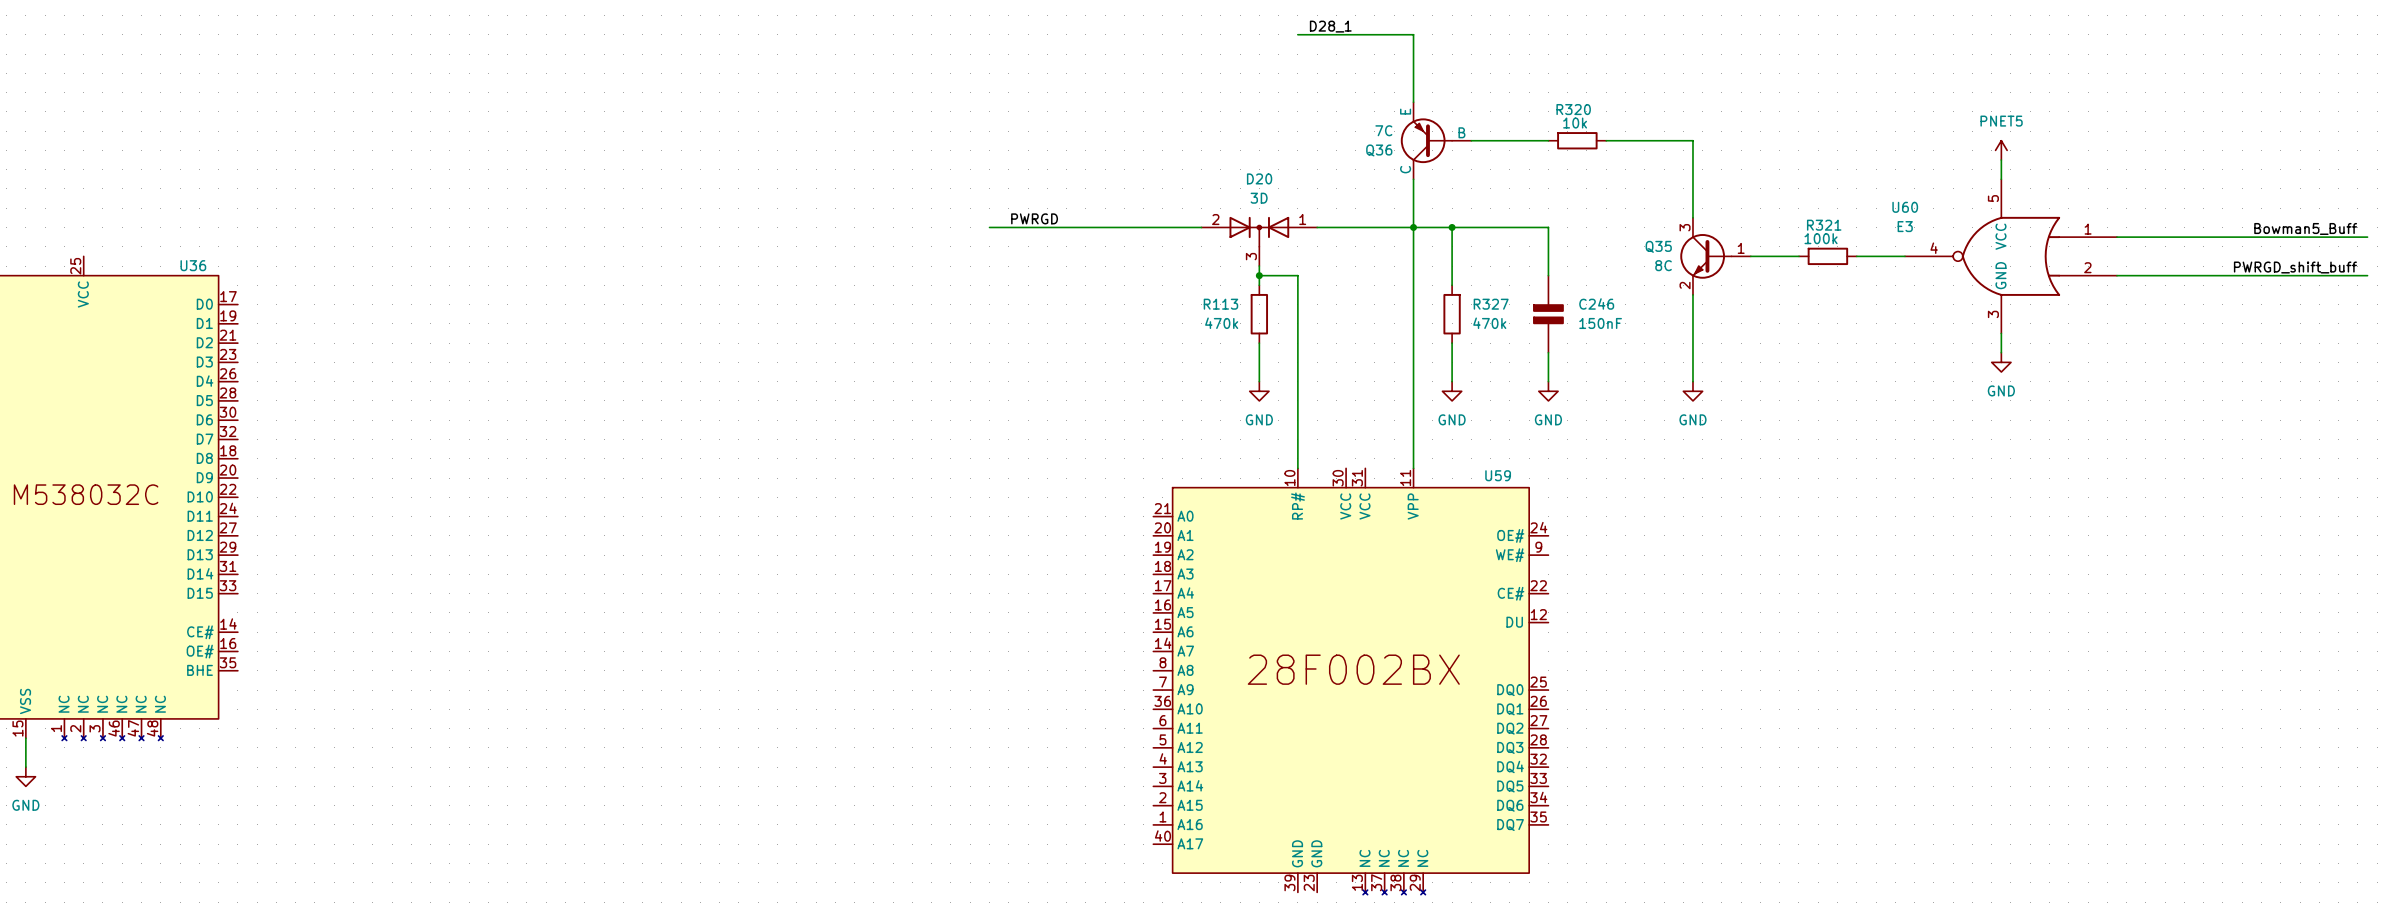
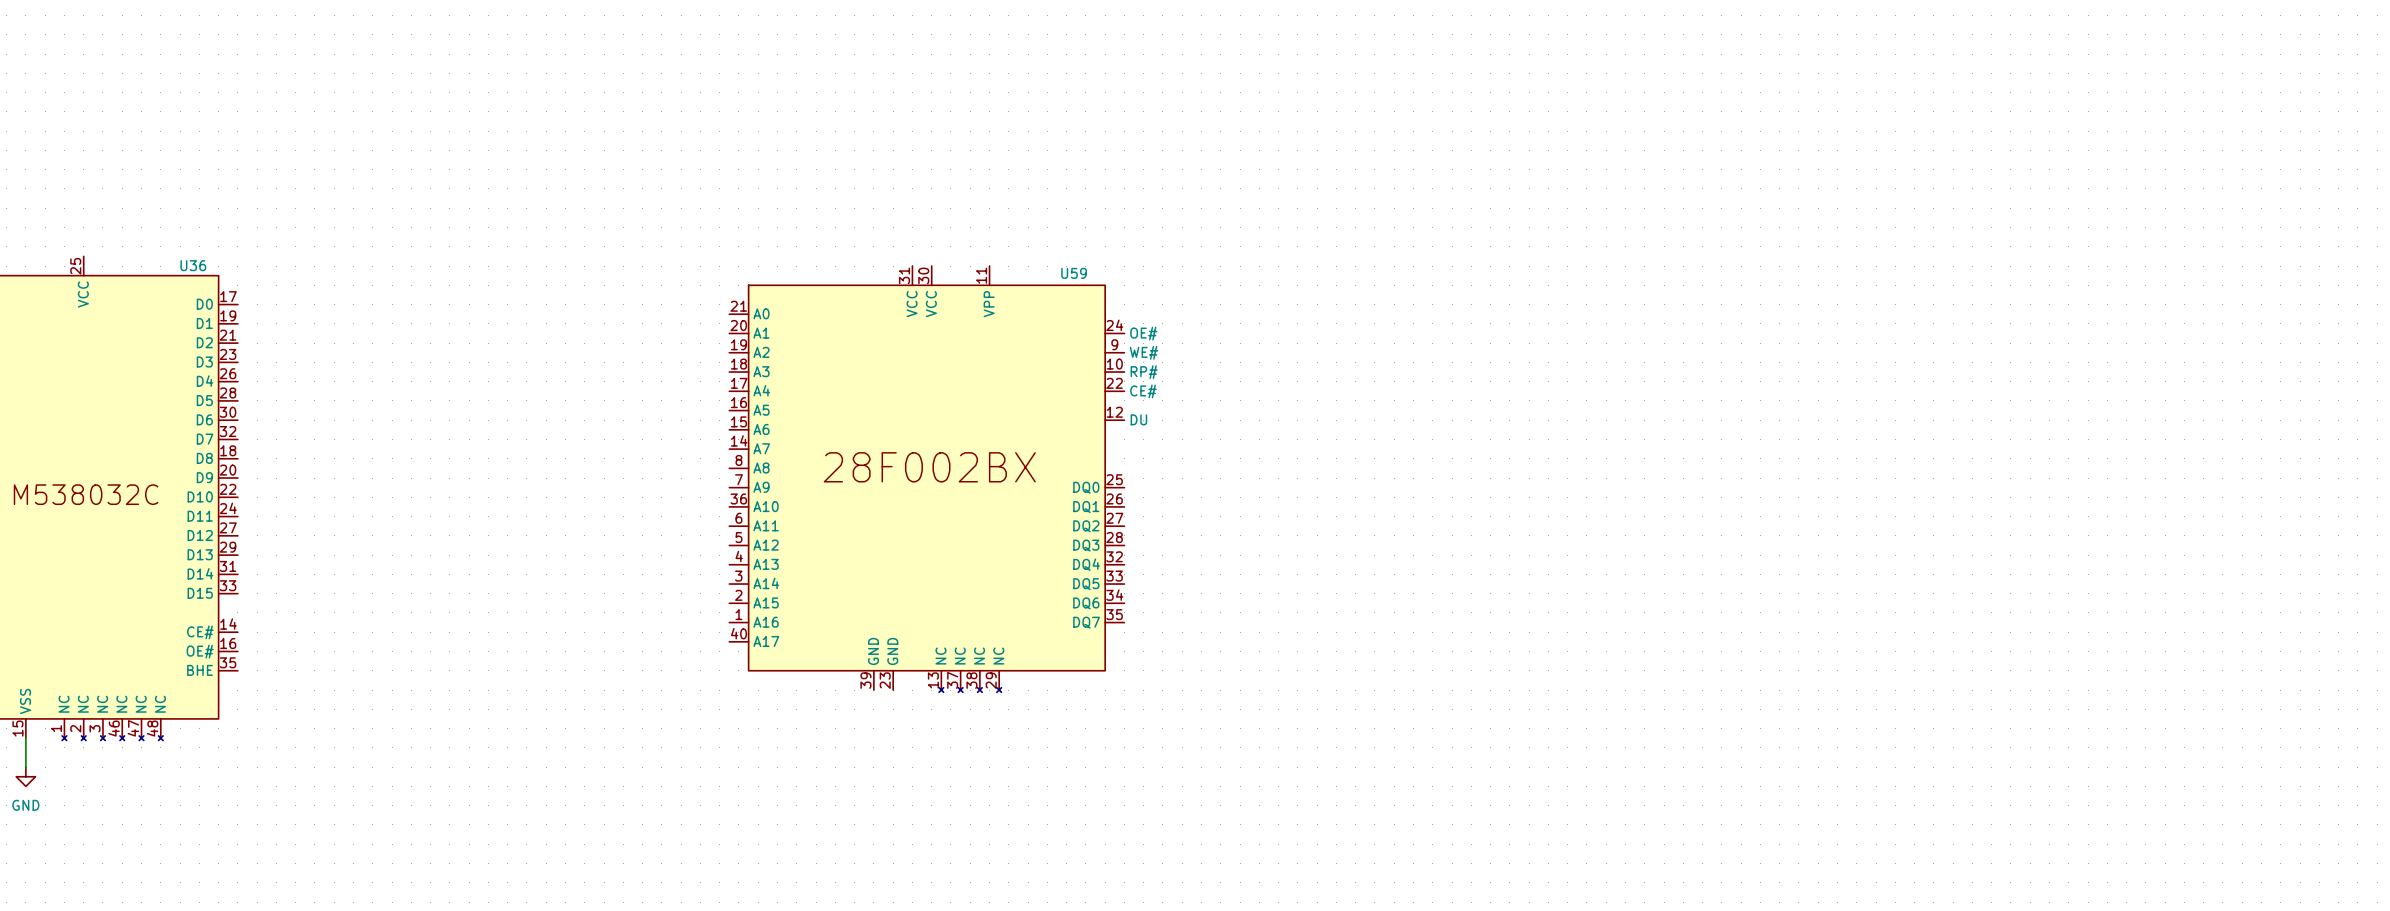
label: D28_1 (1330, 26) -> none
wire: (1297, 34) (1413, 34) (1413, 102) -> none
Q36: 7C (1436, 140) -> none
wire: (1471, 140) (1548, 140) -> none
R320: 10k (1577, 140) -> none
wire: (1606, 140) (1692, 140) (1692, 217) -> none
power symbol: PNET5 (2001, 150) -> none
wire: (2001, 160) (2001, 179) -> none
wire: (1413, 179) (1413, 468) -> none
label: PWRGD (1034, 218) -> none
wire: (989, 227) (1201, 227) -> none
wire: (1317, 227) (1548, 227) (1548, 275) -> none
junction: (1413, 227) -> none
wire: (1452, 227) (1452, 285) -> none
junction: (1452, 227) -> none
label: Bowman5_Buff (2305, 228) -> none
wire: (2116, 237) (2367, 237) -> none
D20: 3D (1259, 241) -> none
Q35: 8C (1715, 256) -> none
wire: (1750, 256) (1798, 256) -> none
R321: 100k (1827, 256) -> none
wire: (1856, 256) (1904, 256) -> none
U60: E3 (2010, 256) -> none
wire: (1259, 266) (1259, 285) -> none
label: PWRGD_shift_buff (2295, 267) -> none
wire: (1259, 275) (1297, 275) (1297, 468) -> none
junction: (1259, 275) -> none
wire: (2116, 275) (2367, 275) -> none
wire: (1692, 294) (1692, 381) -> none
R113: 470k (1259, 314) -> none
R327: 470k (1452, 314) -> none
C246: 150nF (1548, 314) -> none
wire: (2001, 333) (2001, 352) -> none
wire: (1259, 343) (1259, 381) -> none
wire: (1452, 343) (1452, 381) -> none
wire: (1548, 352) (1548, 381) -> none
power symbol: GND (2001, 362) -> none
power symbol: GND (1259, 391) -> none
power symbol: GND (1452, 391) -> none
power symbol: GND (1548, 391) -> none
power symbol: GND (1692, 391) -> none
U59 symbol: [1153, 468, 1549, 895] -> [729, 266, 1125, 693]

